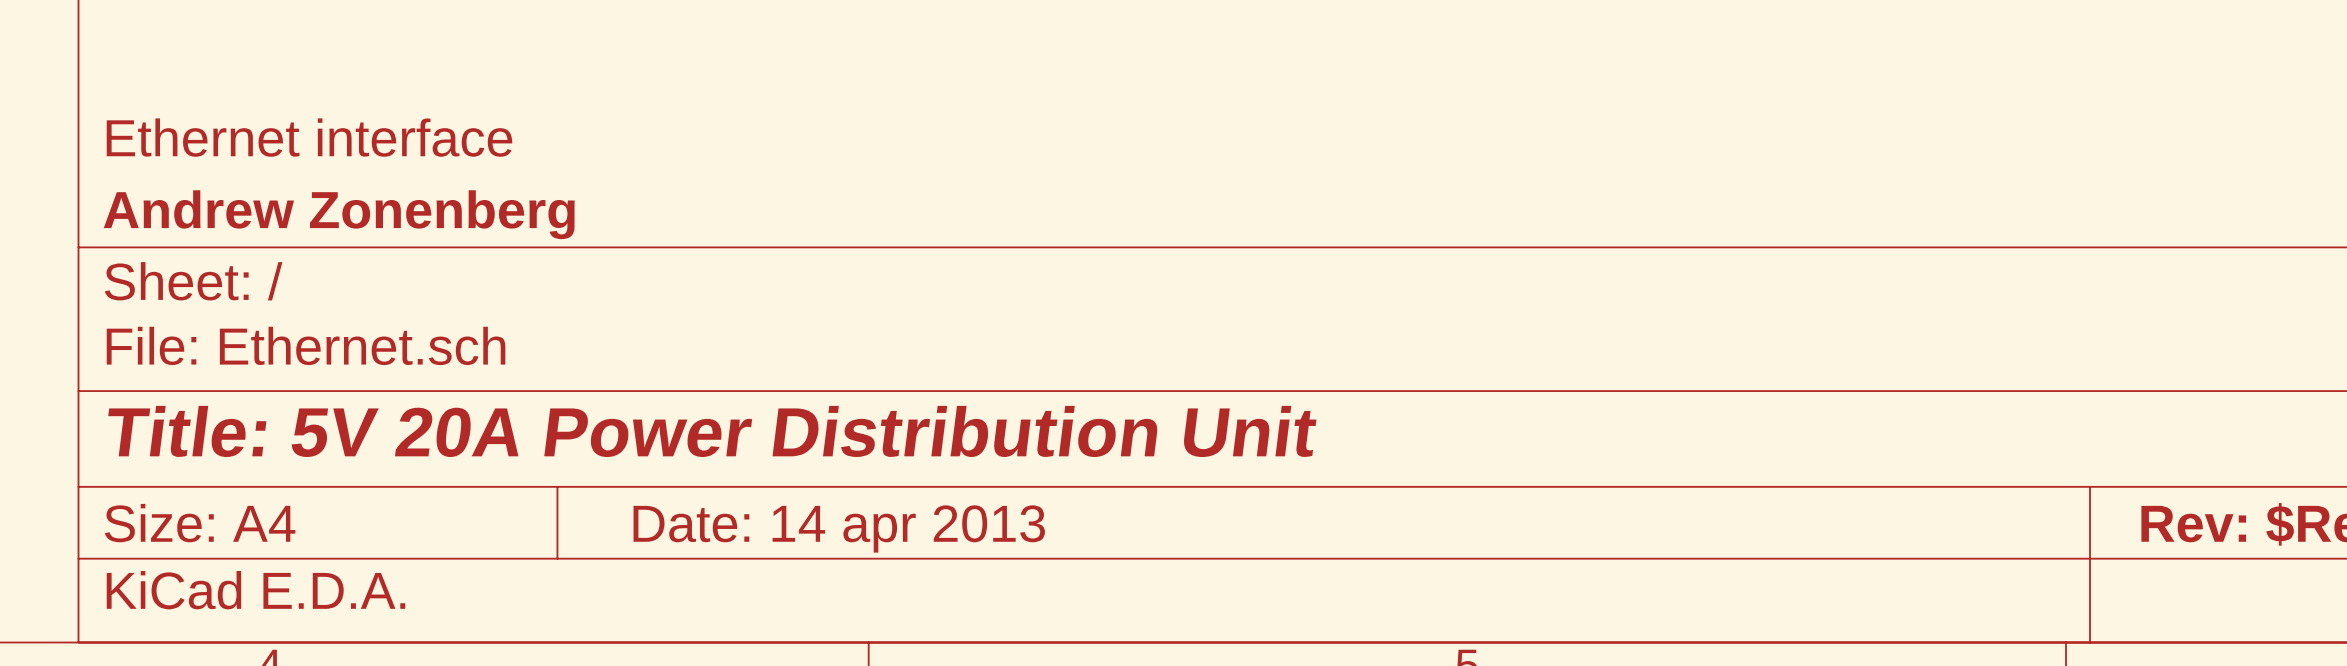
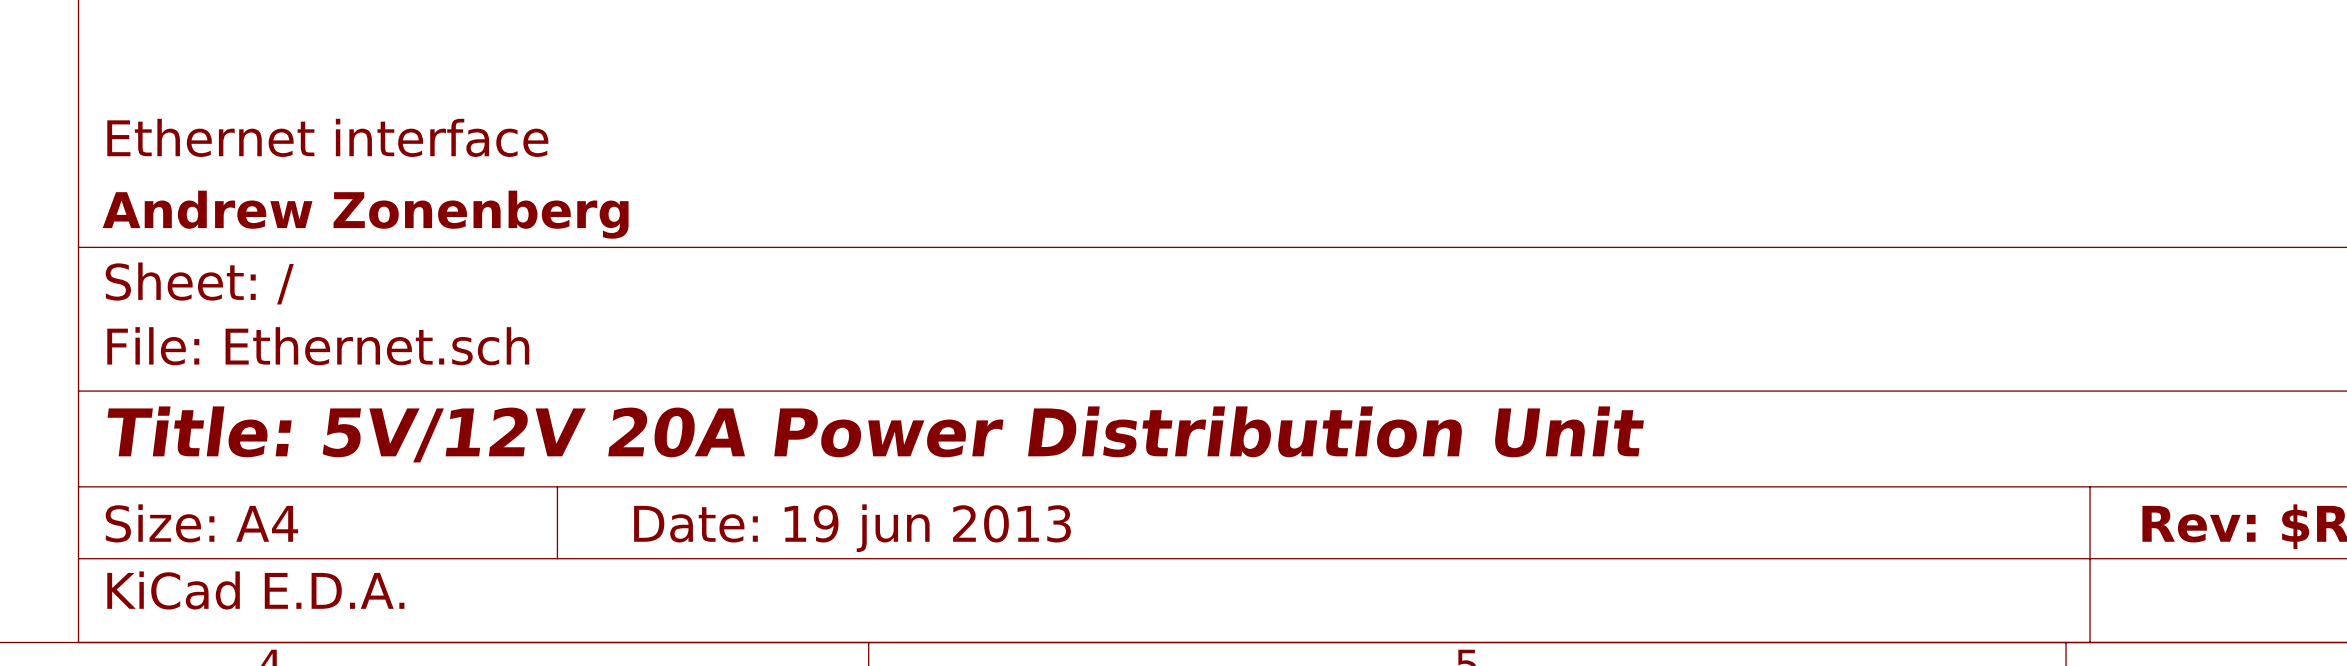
title block: Title: 5V 20A Power Distribution Unit (712, 431) -> Title: 5V/12V 20A Power Distribution Unit (875, 434)
title block: Date: 14 apr 2013 (839, 528) -> Date: 19 jun 2013 (852, 528)

